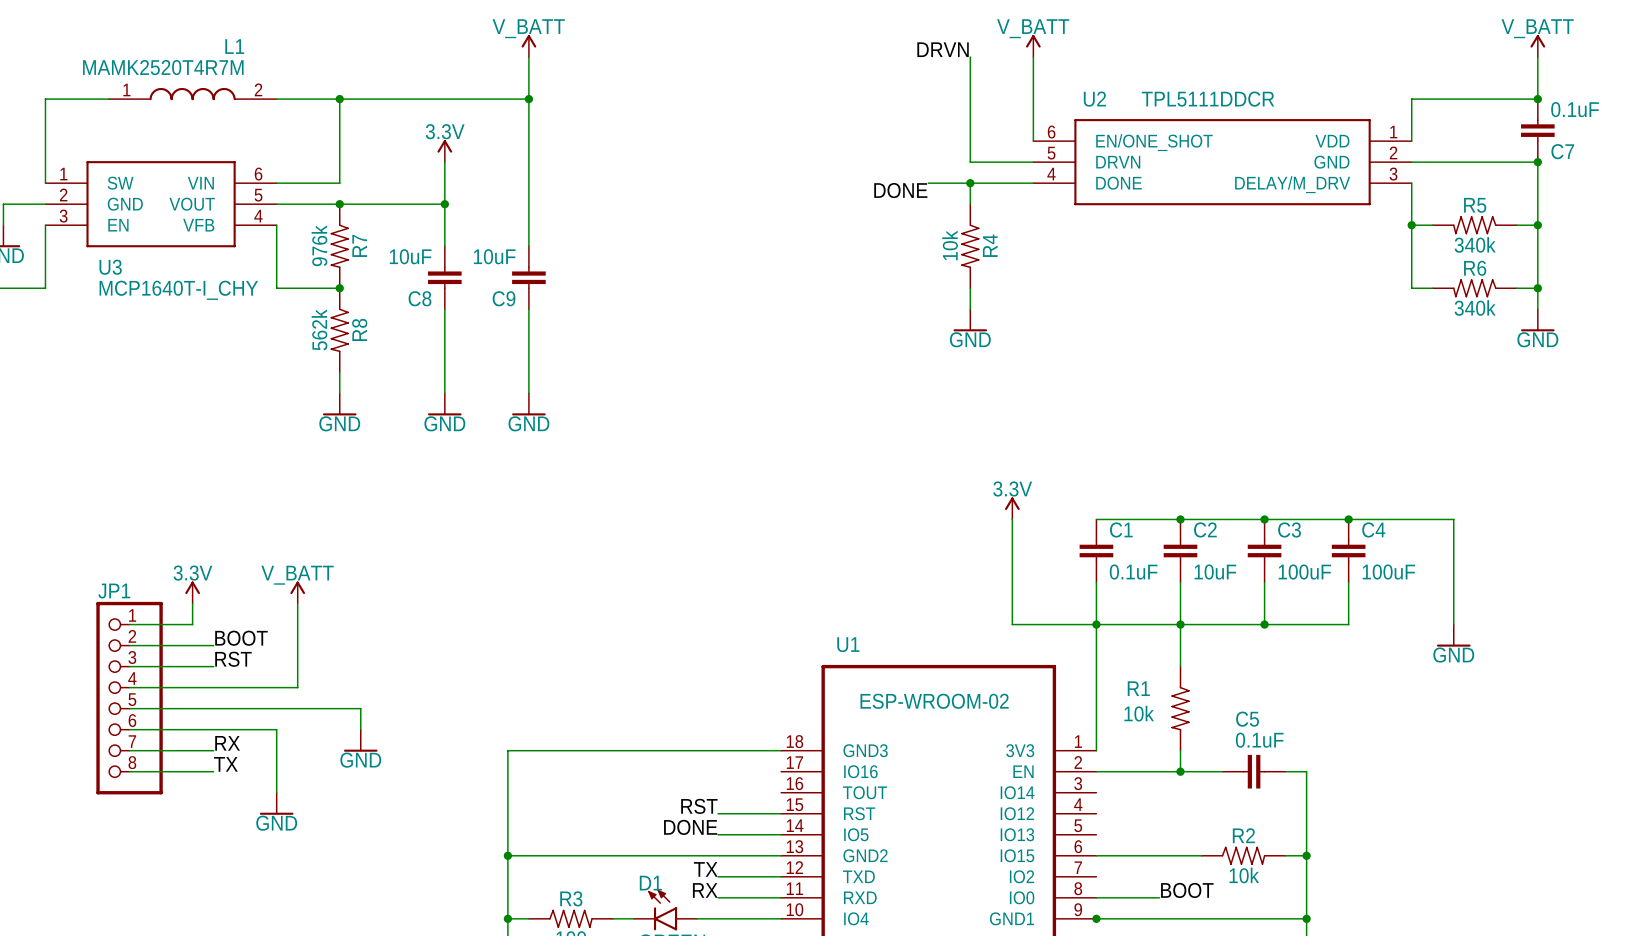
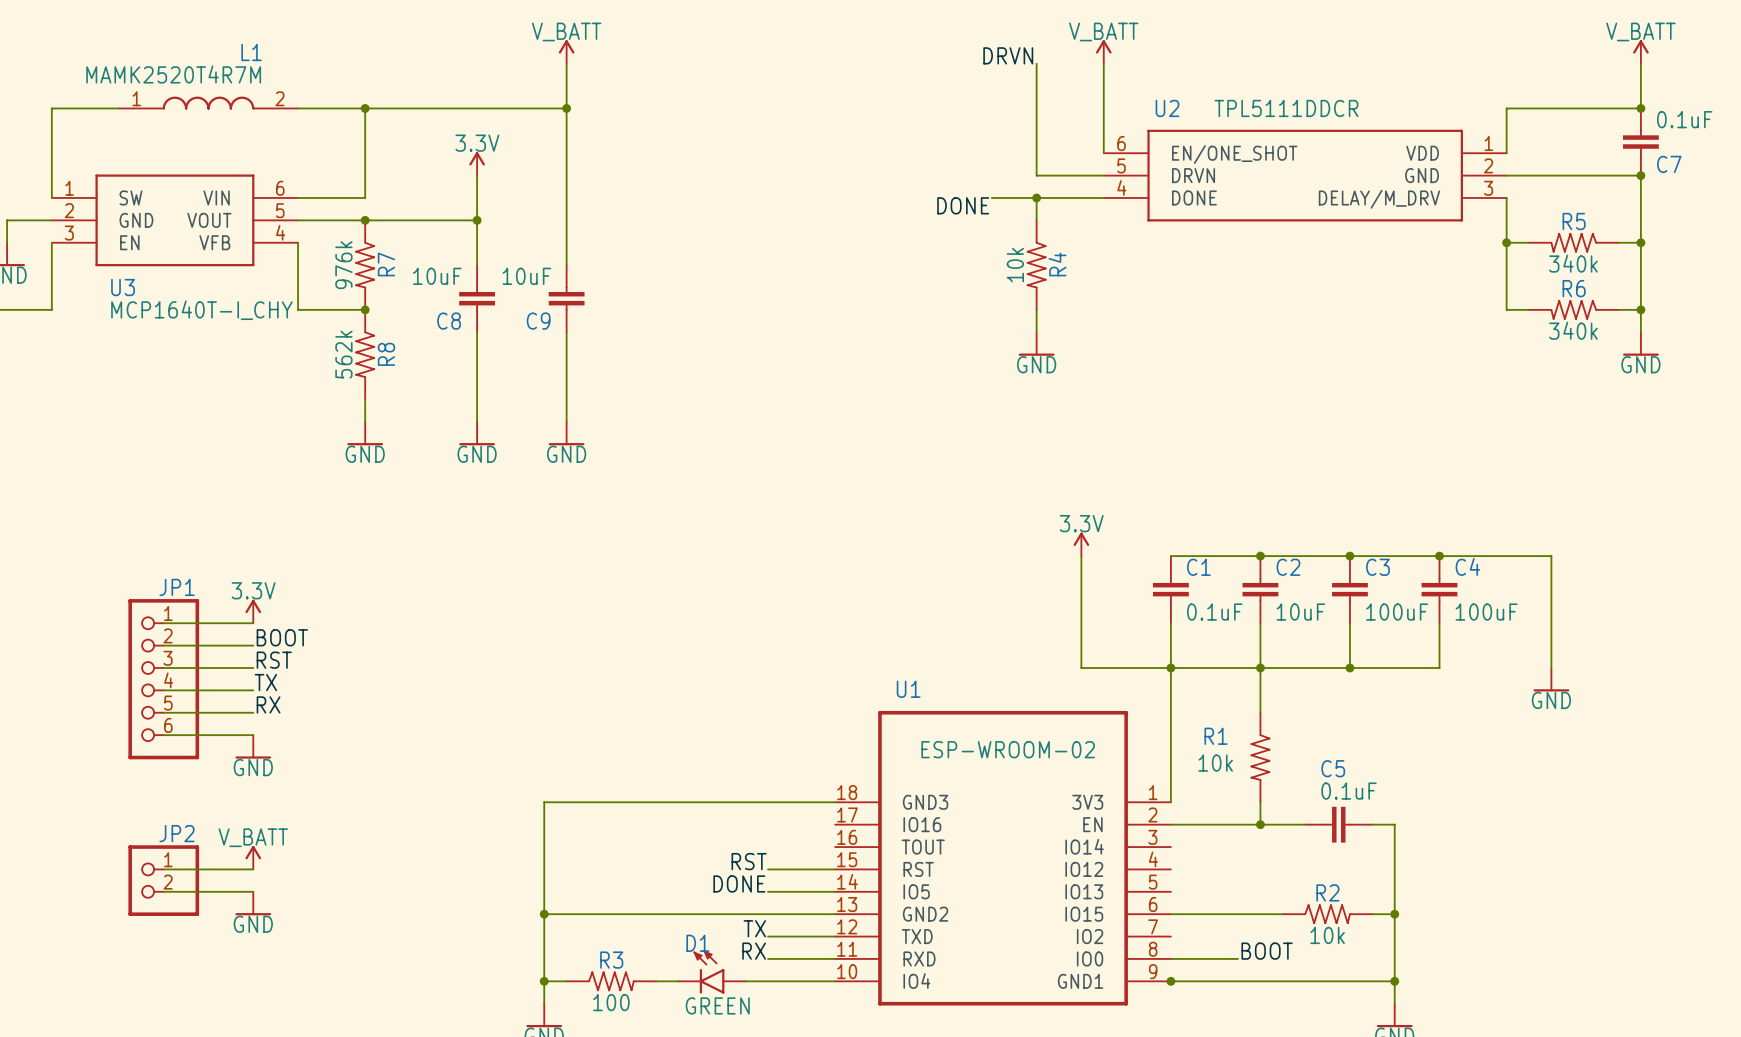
wire: none -> (163, 623) (253, 623)
JP1 name position: JP1 (114, 591) -> JP1 (177, 587)
power symbol position: 3.3V (192, 592) -> 3.3V (253, 611)
power symbol: V_BATT (297, 592) -> none
JP1 symbol: [96, 601, 163, 795] -> [128, 599, 200, 760]
wire: none -> (163, 645) (253, 645)
wire: (192, 603) (192, 624) -> (253, 667) (208, 667)
wire: (297, 603) (297, 687) (234, 687) -> none
label position: BOOT (241, 638) -> BOOT (282, 637)
label position: RST (233, 659) -> RST (274, 660)
power symbol: none -> GND (253, 746)
wire: (129, 708) (360, 708) (360, 729) -> none
wire: (129, 729) (276, 729) (276, 792) -> none
power symbol: GND (360, 740) -> none
label position: RX (227, 743) -> RX (268, 704)
wire: (129, 750) (213, 750) -> (163, 869) (253, 869)
label position: TX (225, 764) -> TX (265, 682)
wire: (129, 771) (213, 771) -> (163, 891) (253, 891)
power symbol: none -> V_BATT (253, 857)
power symbol: GND (276, 803) -> none
JP2: none -> (163, 880)
power symbol: none -> GND (253, 903)

